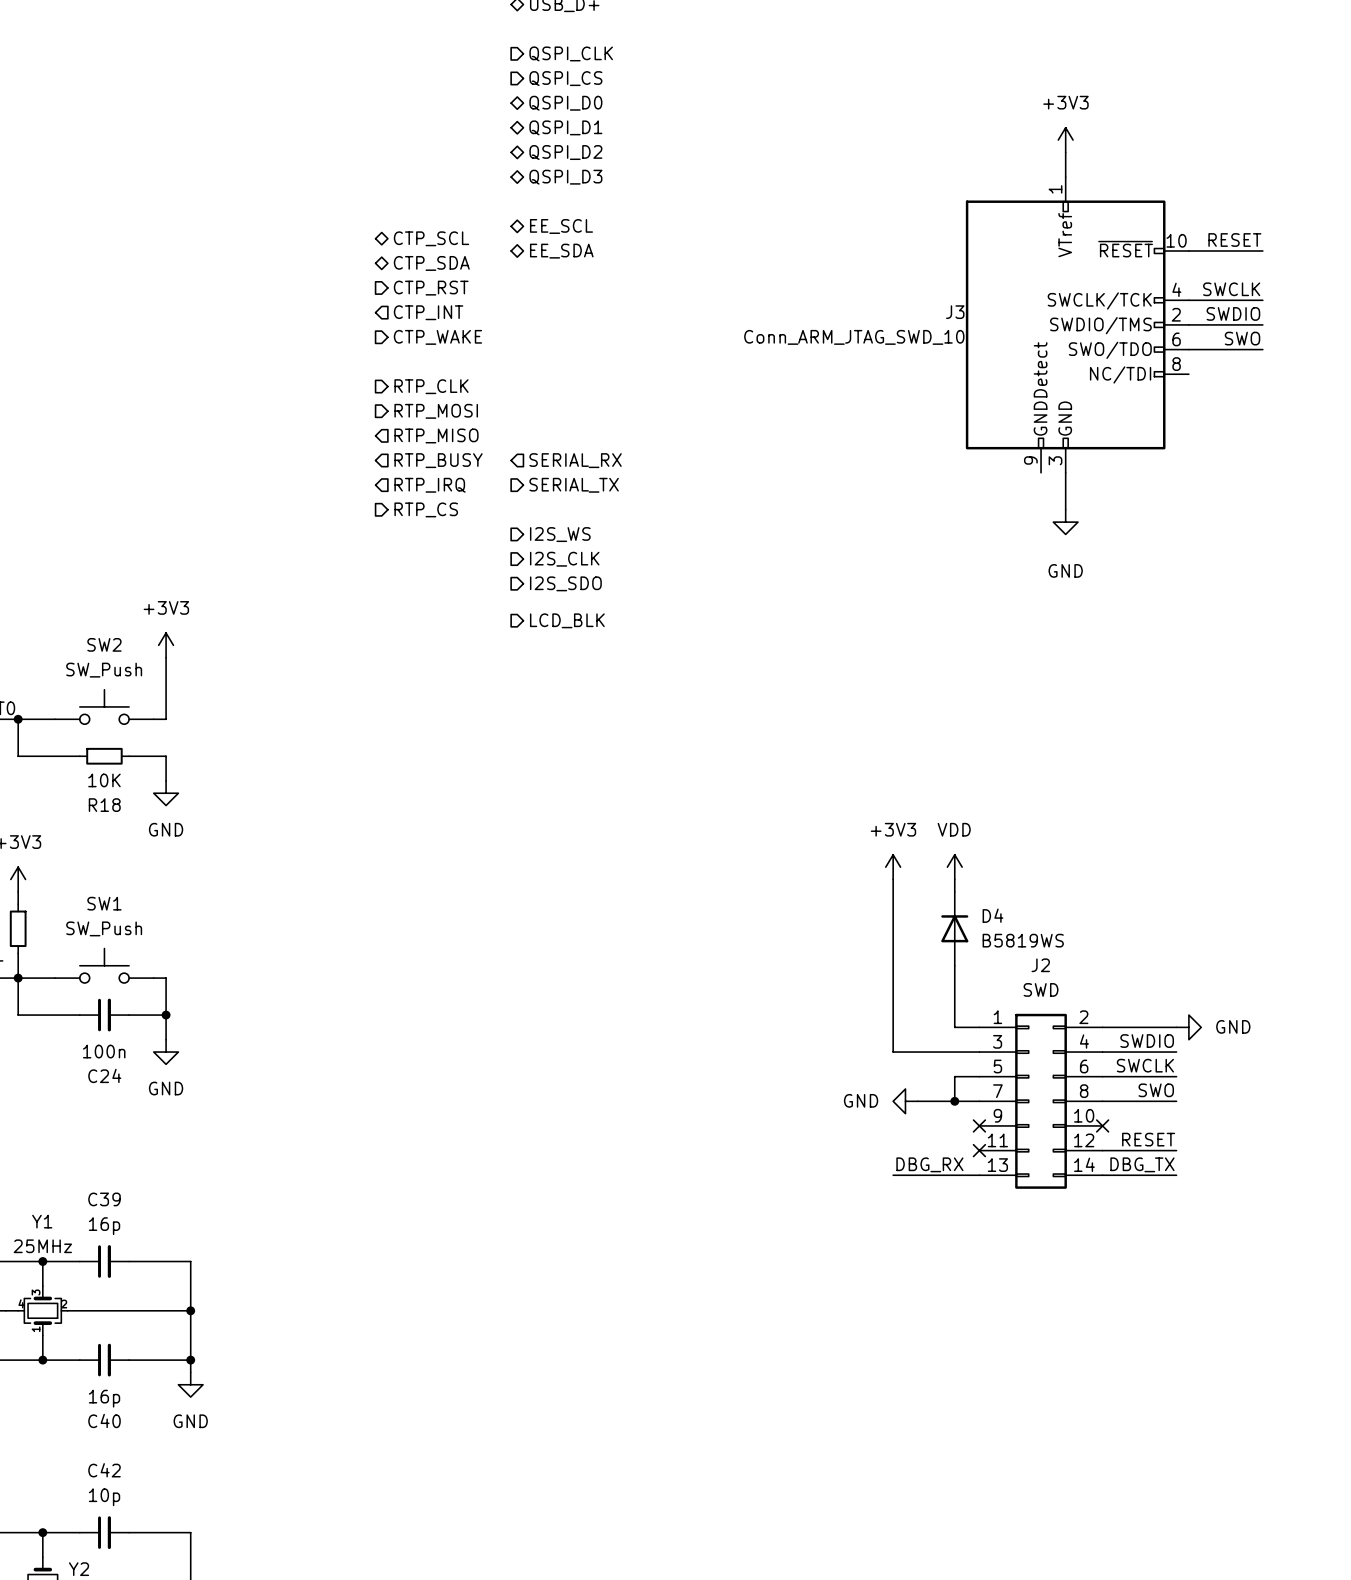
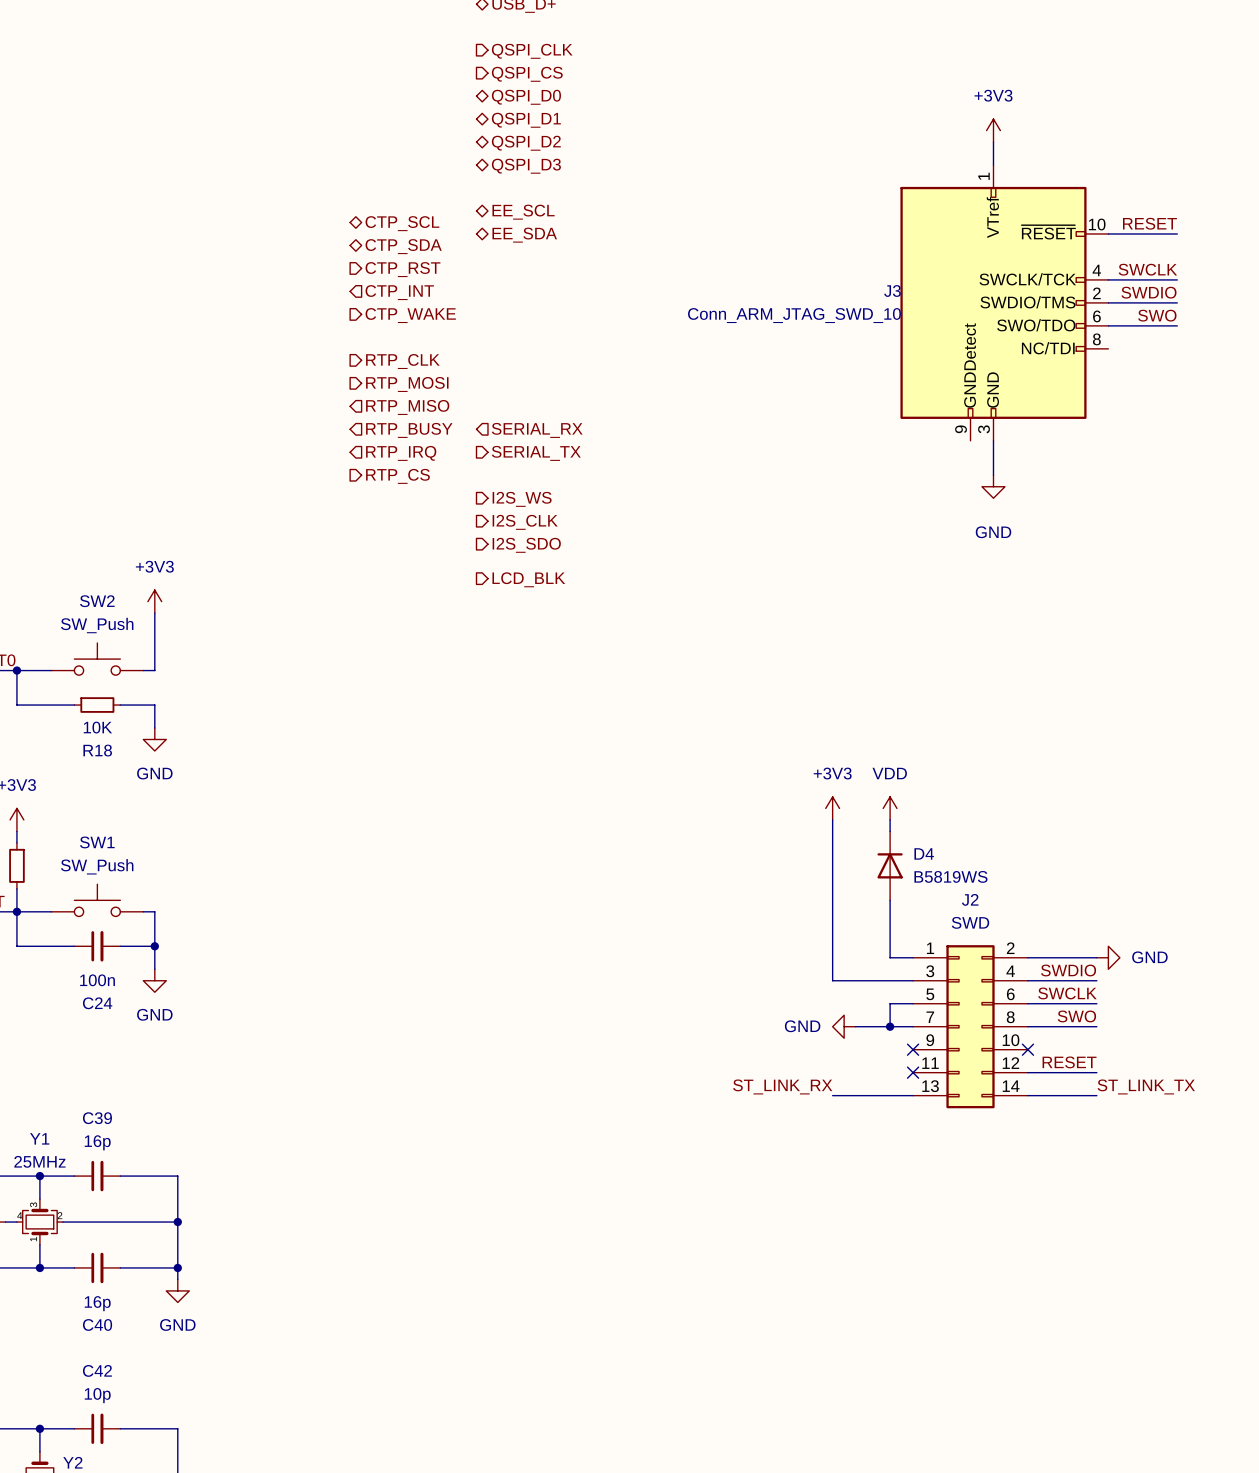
label: DBG_RX (929, 1164) -> ST_LINK_RX (782, 1086)
label: DBG_TX (1142, 1164) -> ST_LINK_TX (1146, 1086)

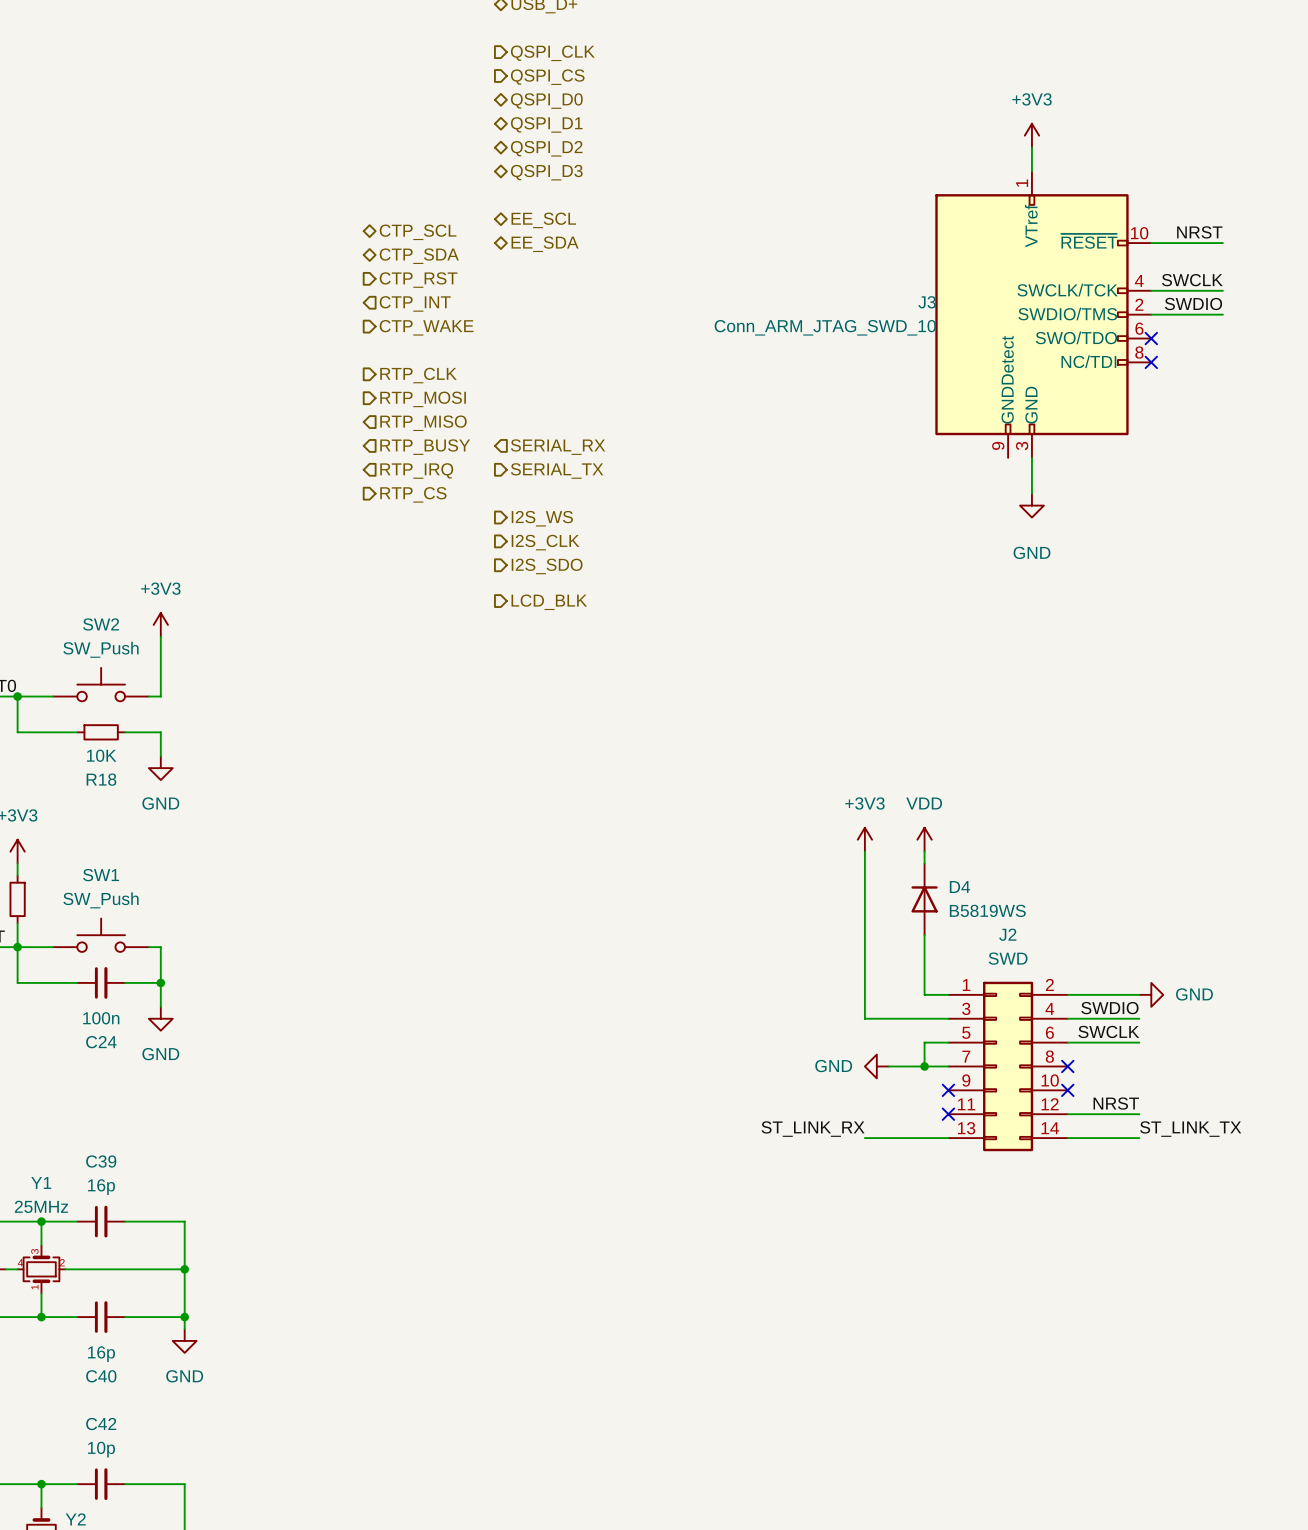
label: RESET (1149, 223) -> NRST (1199, 232)
label: SWO (1157, 315) -> none
wire: (1108, 325) (1177, 325) -> none
no-connect mark: none -> (1151, 338)
no-connect mark: none -> (1151, 362)
label: SWO (1076, 1016) -> none
wire: (1027, 1026) (1096, 1026) -> none
no-connect mark: none -> (1067, 1066)
label: RESET (1069, 1062) -> NRST (1116, 1103)

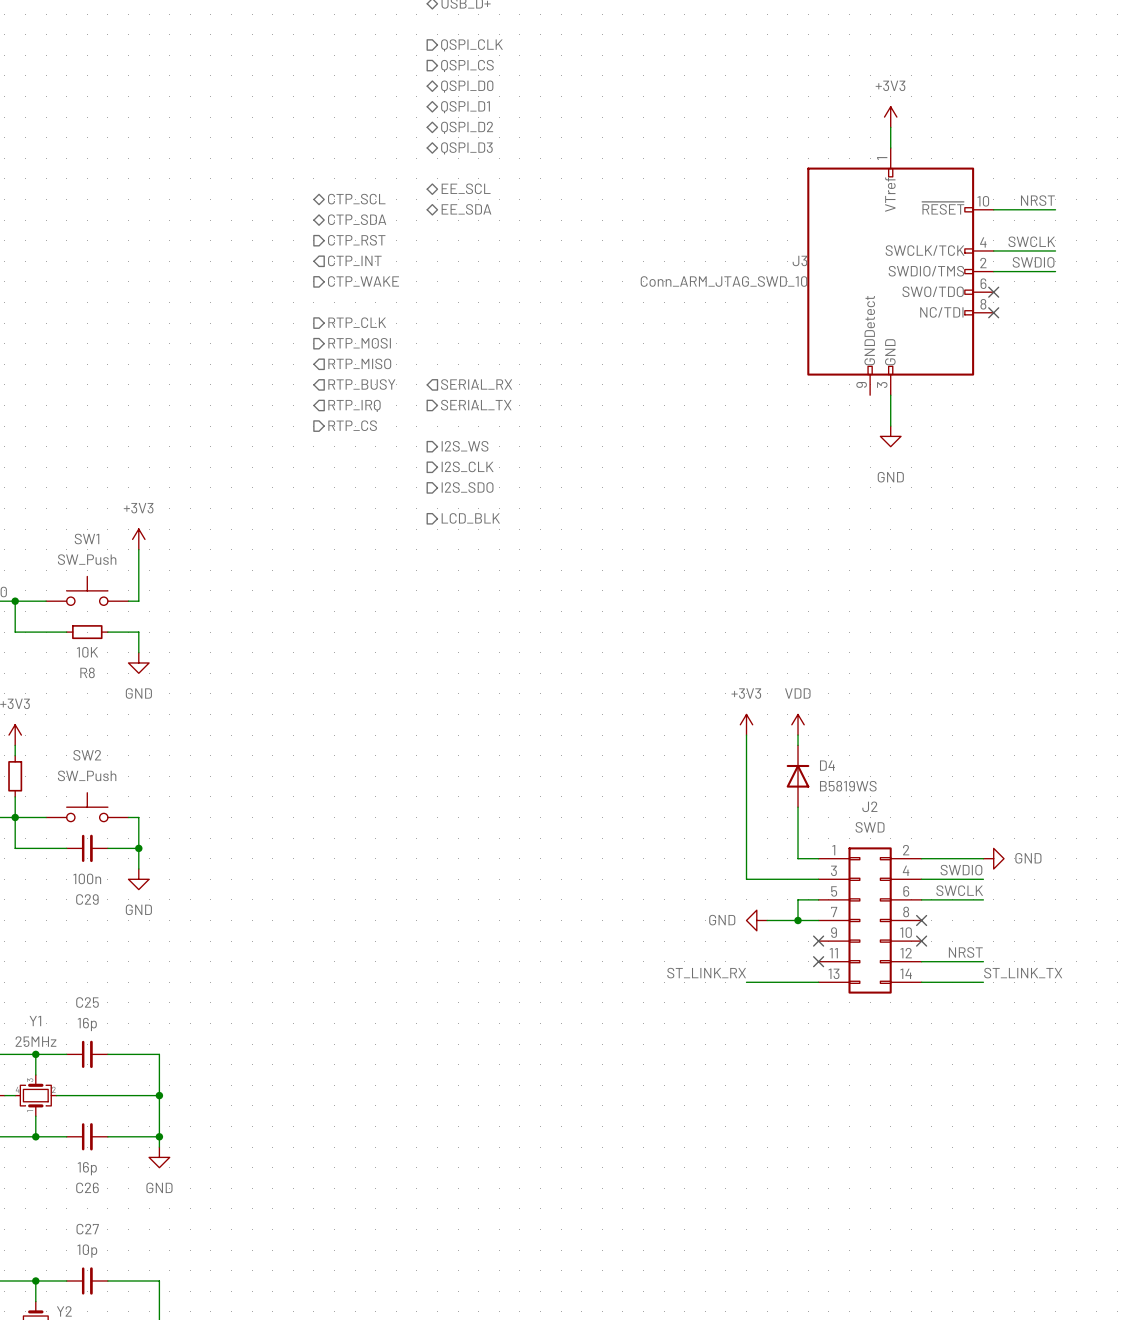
SW2 name: SW2 (101, 624) -> SW1 (86, 539)
R18 name: R18 (101, 779) -> R8 (87, 672)
SW1 name: SW1 (101, 875) -> SW2 (87, 755)
C24 name: C24 (101, 1042) -> C29 (87, 899)
C39 name: C39 (101, 1161) -> C25 (87, 1002)
C40 name: C40 (101, 1376) -> C26 (87, 1187)
C42 name: C42 (101, 1424) -> C27 (87, 1229)

